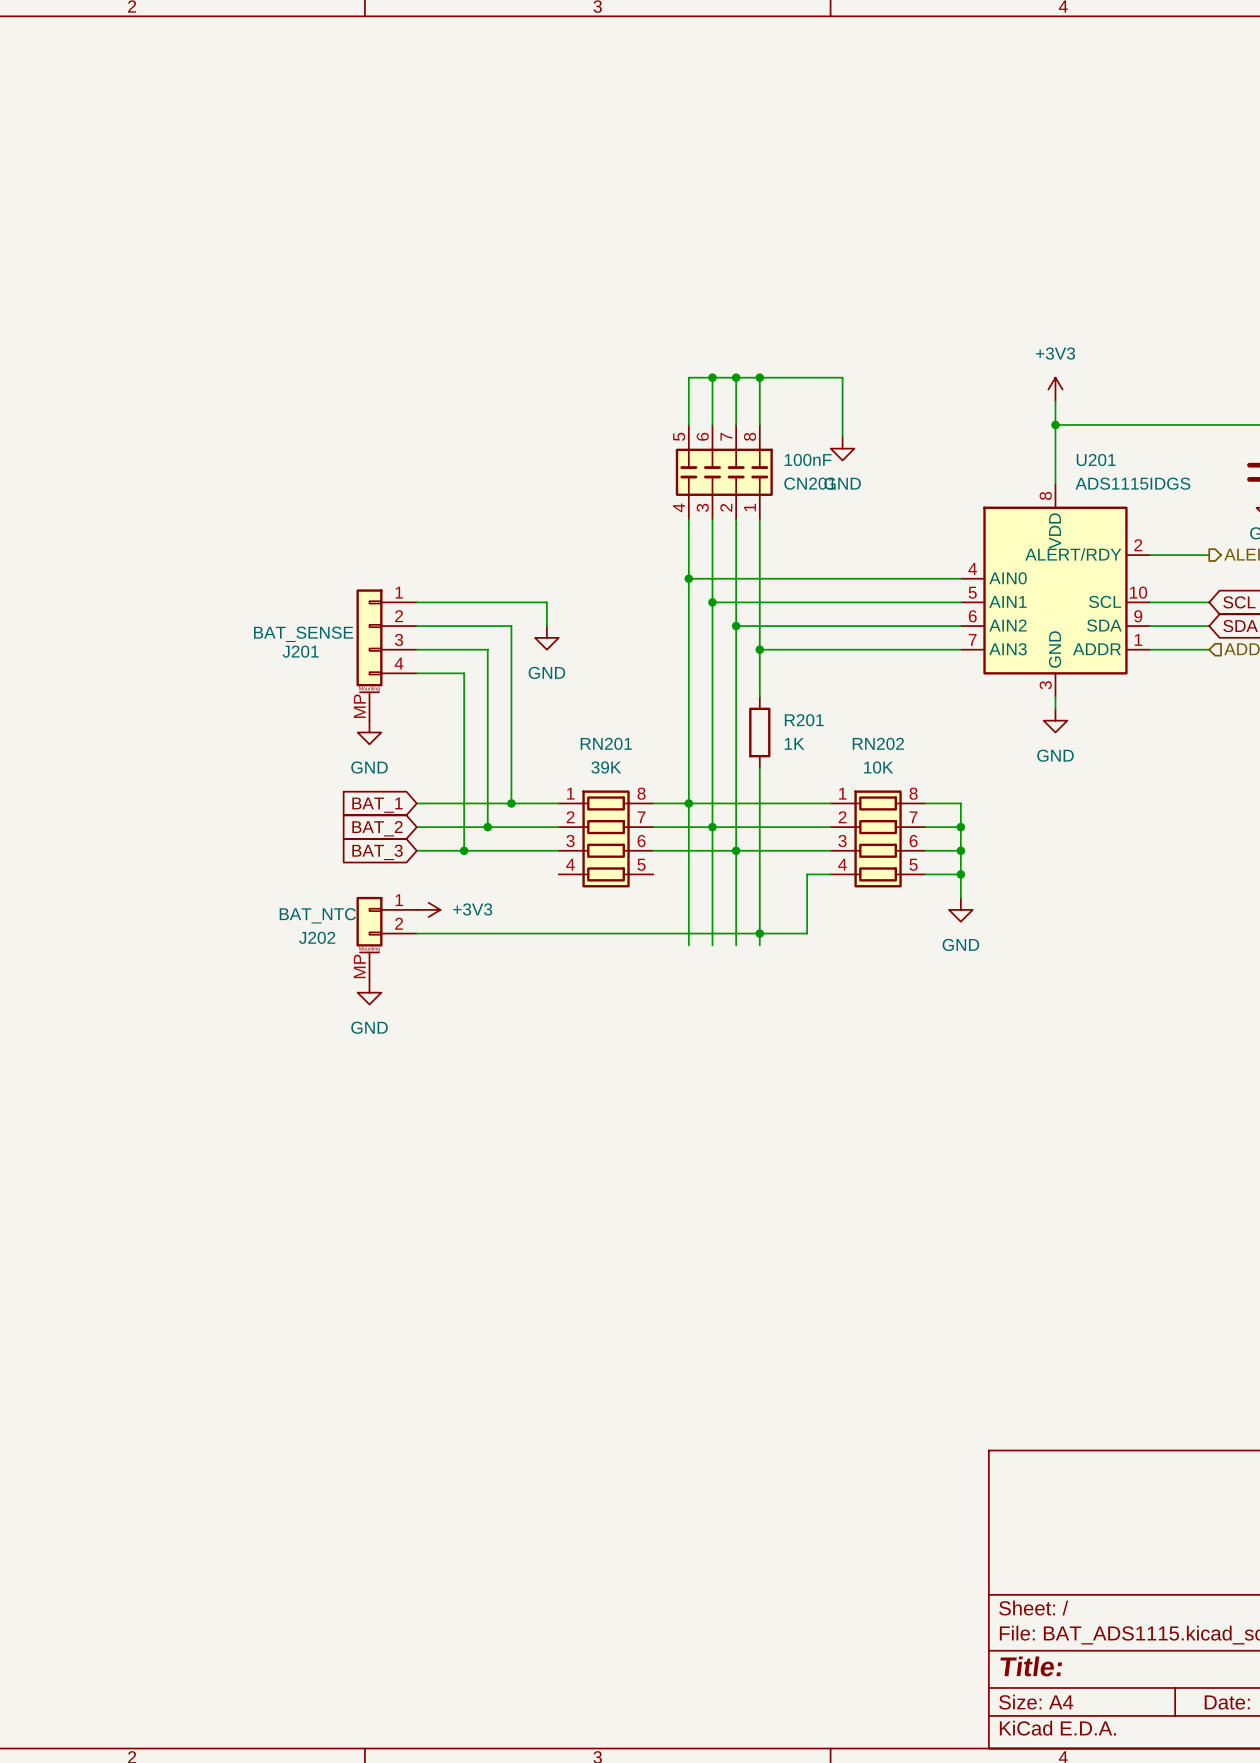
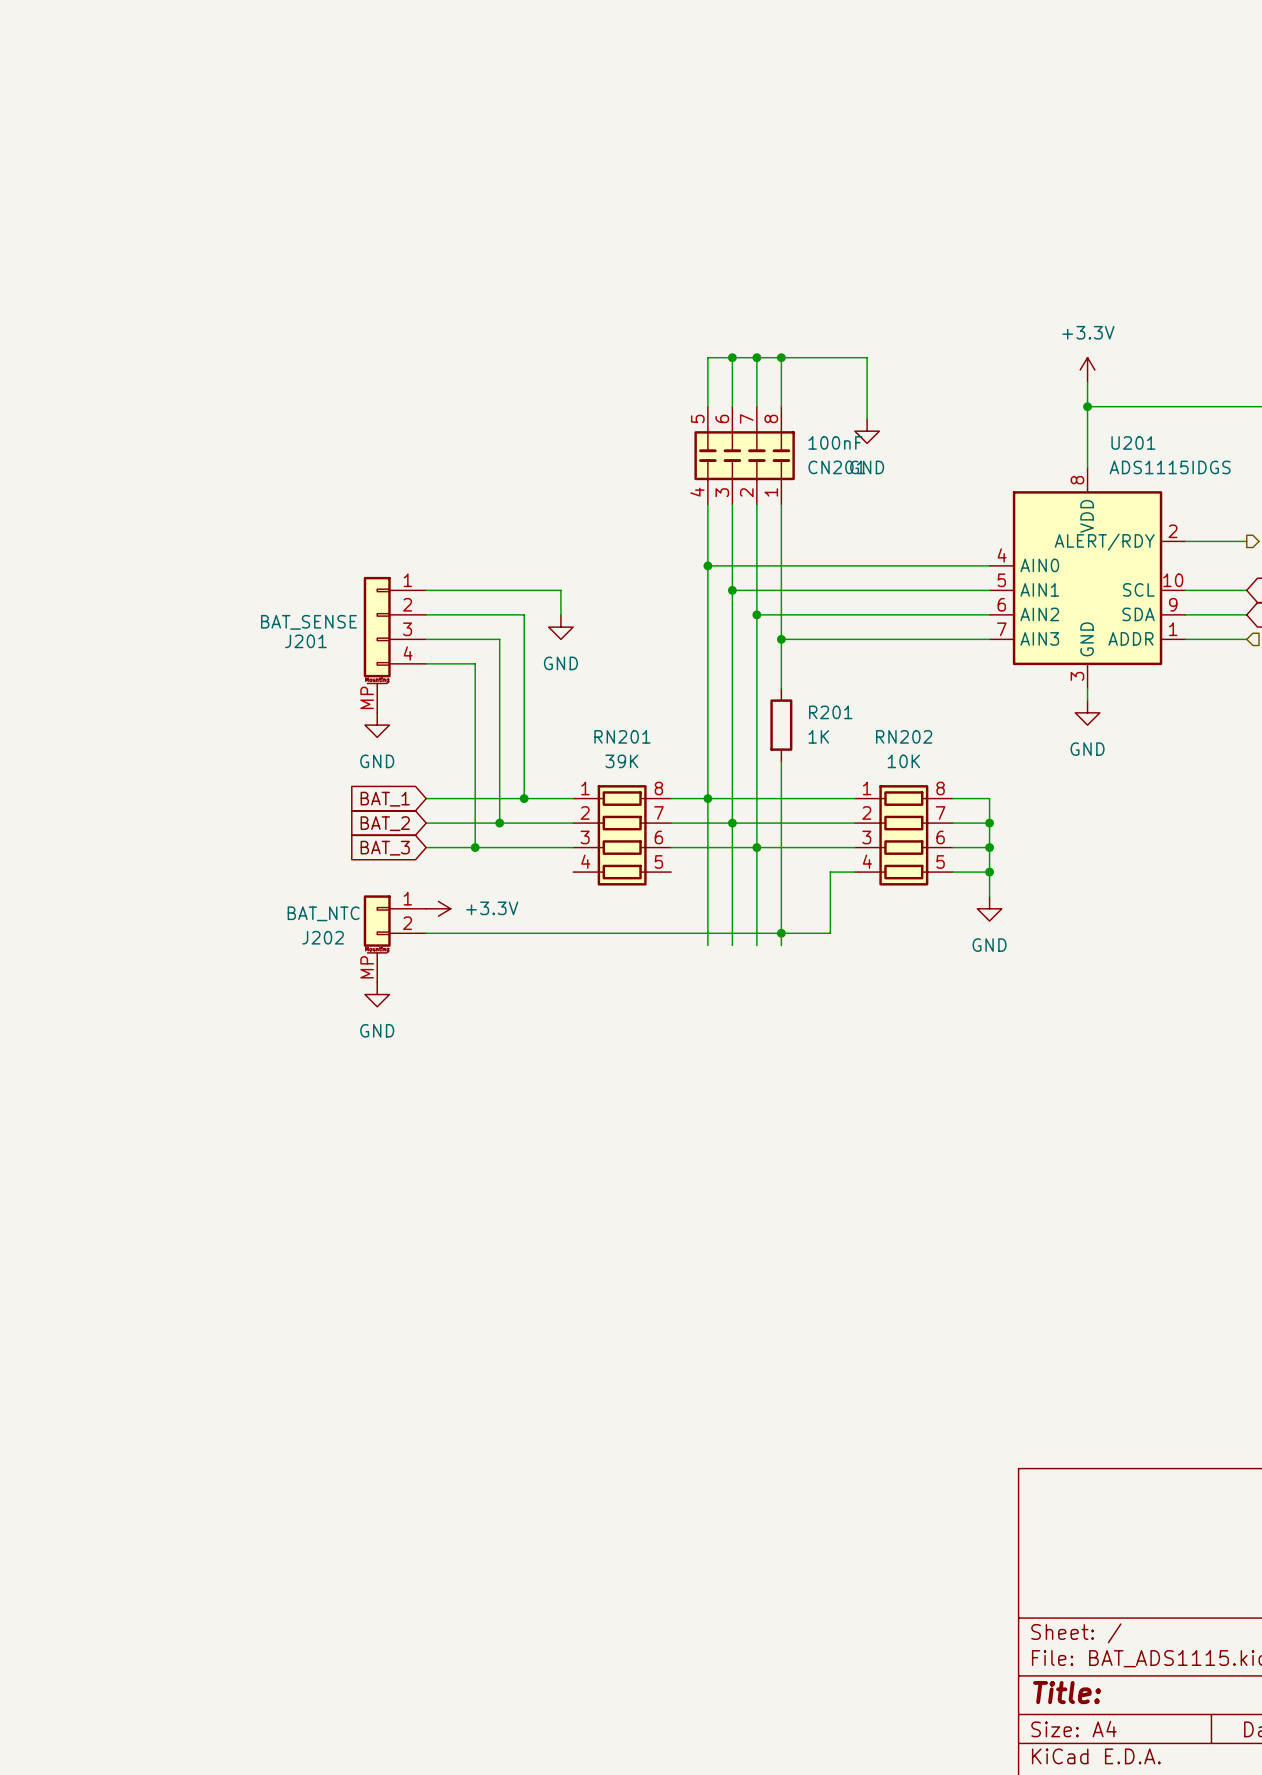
power symbol: +3V3 (1055, 389) -> +3.3V (1087, 369)
power symbol: +3V3 (428, 909) -> +3.3V (438, 908)

